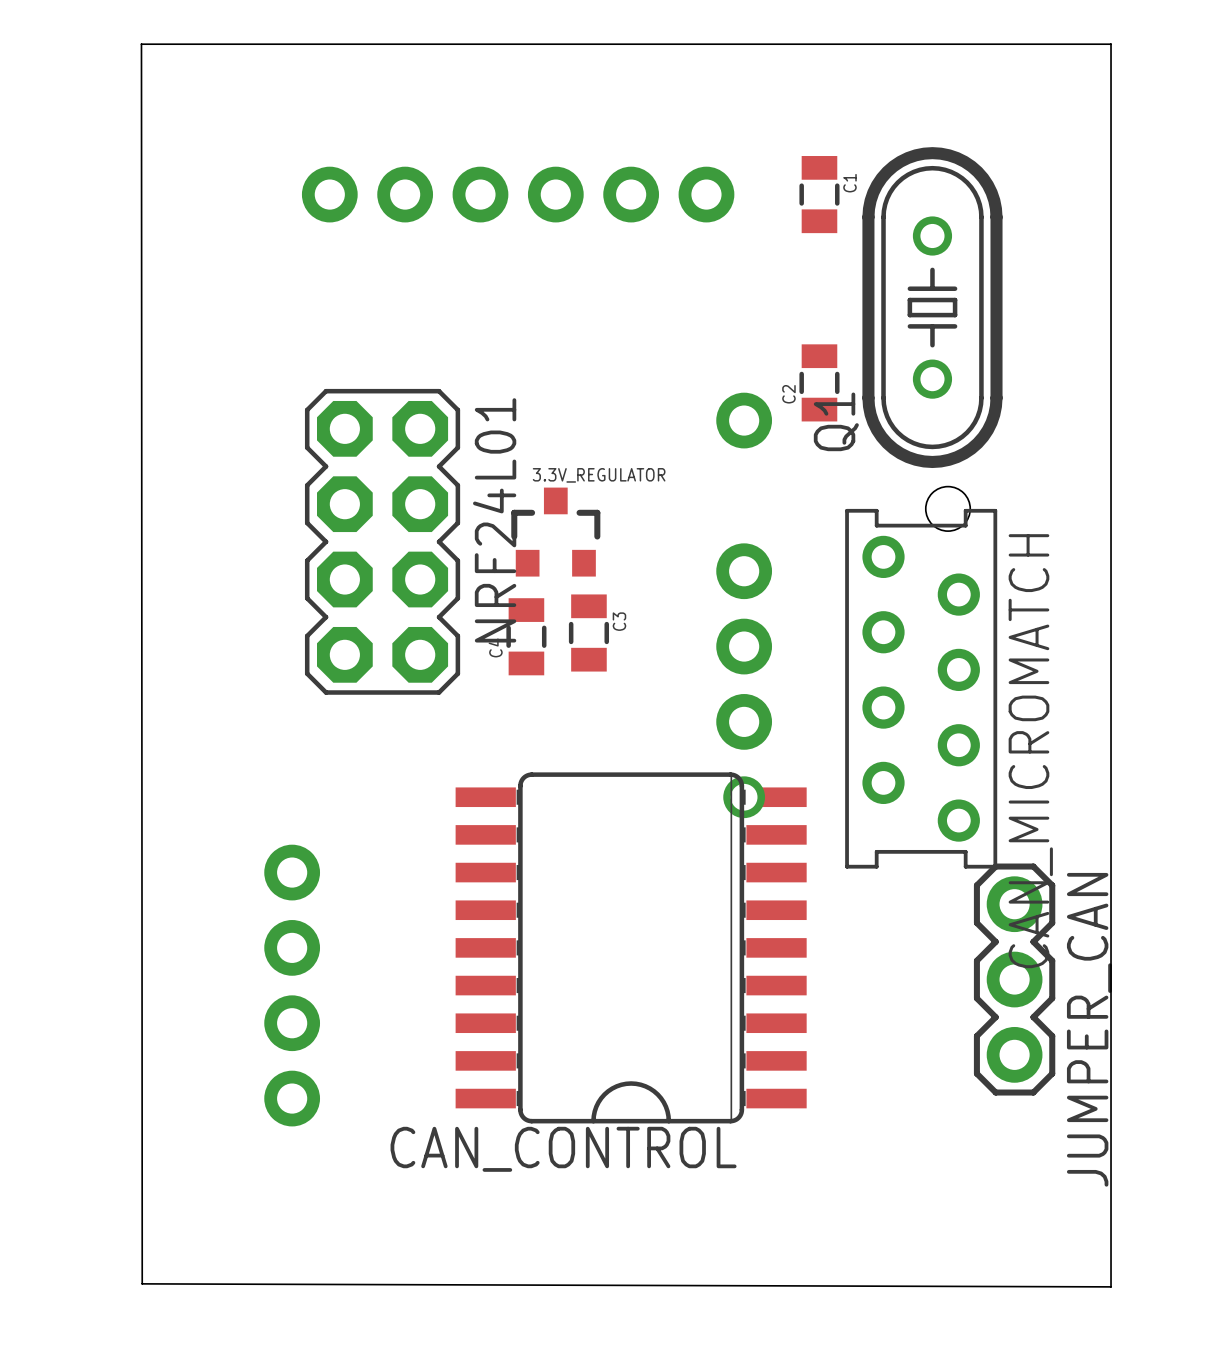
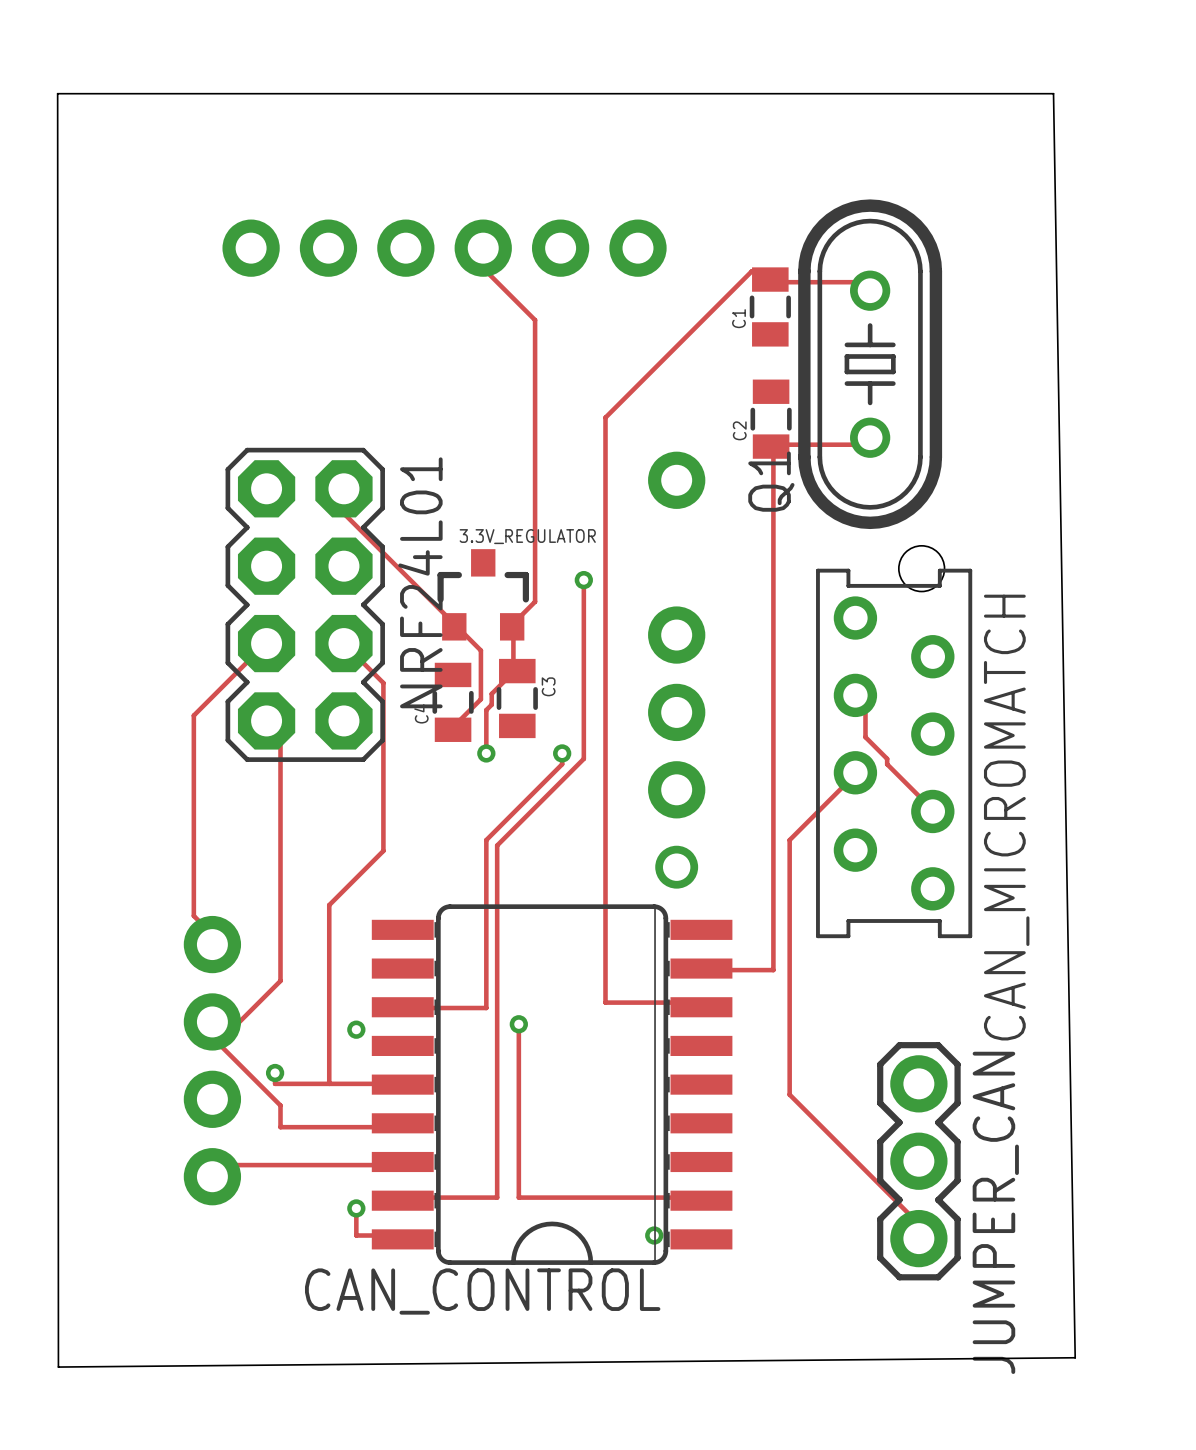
board edge: (1111, 44) (1111, 1286) (142, 1283) -> (1053, 93) (1075, 1357) (58, 1367)
C1 name position: C1 (849, 183) -> C1 (738, 318)
track: none -> (483, 248) (486, 249) (486, 271) (535, 320) (535, 601) (512, 626) (513, 666) (517, 671) (513, 672) (491, 693) (491, 704) (486, 710) (486, 753)
C1 position: (819, 194) -> (770, 306)
track: none -> (870, 290) (865, 287) (865, 282) (773, 282) (767, 276) (767, 271) (751, 271) (605, 417) (605, 1002) (697, 1002) (701, 1007)
track: none -> (870, 437) (865, 439) (865, 444) (773, 444) (771, 446) (773, 450) (773, 970) (702, 970) (701, 968)
C2 position: (819, 382) -> (771, 419)
track: none -> (343, 488) (345, 515) (453, 623) (454, 626) (459, 628) (480, 650) (480, 699) (453, 726) (453, 729)
track: none -> (583, 580) (583, 758) (497, 845) (497, 1197) (405, 1197) (402, 1200)
via: none -> (583, 580)
track: none -> (266, 643) (193, 715) (193, 915) (210, 932) (210, 943) (212, 944)
track: none -> (343, 643) (383, 683) (383, 850) (329, 905) (329, 1083)
track: none -> (855, 695) (865, 704) (865, 737) (887, 758) (887, 764) (932, 811)
track: none -> (266, 720) (269, 720) (280, 731) (280, 980) (220, 1040) (220, 1045) (212, 1021) (215, 1024) (215, 1040) (280, 1105) (280, 1127) (399, 1127) (402, 1123)
CAN_MICROMATCH position: (921, 677) -> (894, 741)
via: none -> (486, 753)
track: none -> (562, 753) (562, 764) (486, 840) (486, 1008) (402, 1007)
via: none -> (562, 753)
track: none -> (855, 772) (789, 840) (789, 1094) (914, 1219) (914, 1235) (918, 1238)
CAN_CONTROL position: (631, 947) -> (552, 1084)
track: none -> (518, 1024) (518, 1197) (697, 1197) (701, 1200)
via: none -> (518, 1024)
via: none -> (356, 1029)
JUMPER_CAN position: (1014, 979) -> (918, 1161)
track: none -> (275, 1073) (275, 1083) (402, 1084)
via: none -> (275, 1073)
track: none -> (402, 1162) (399, 1165) (215, 1165) (215, 1175) (212, 1176)
track: none -> (356, 1208) (356, 1235) (399, 1235) (402, 1239)
via: none -> (356, 1208)
via: none -> (654, 1235)

